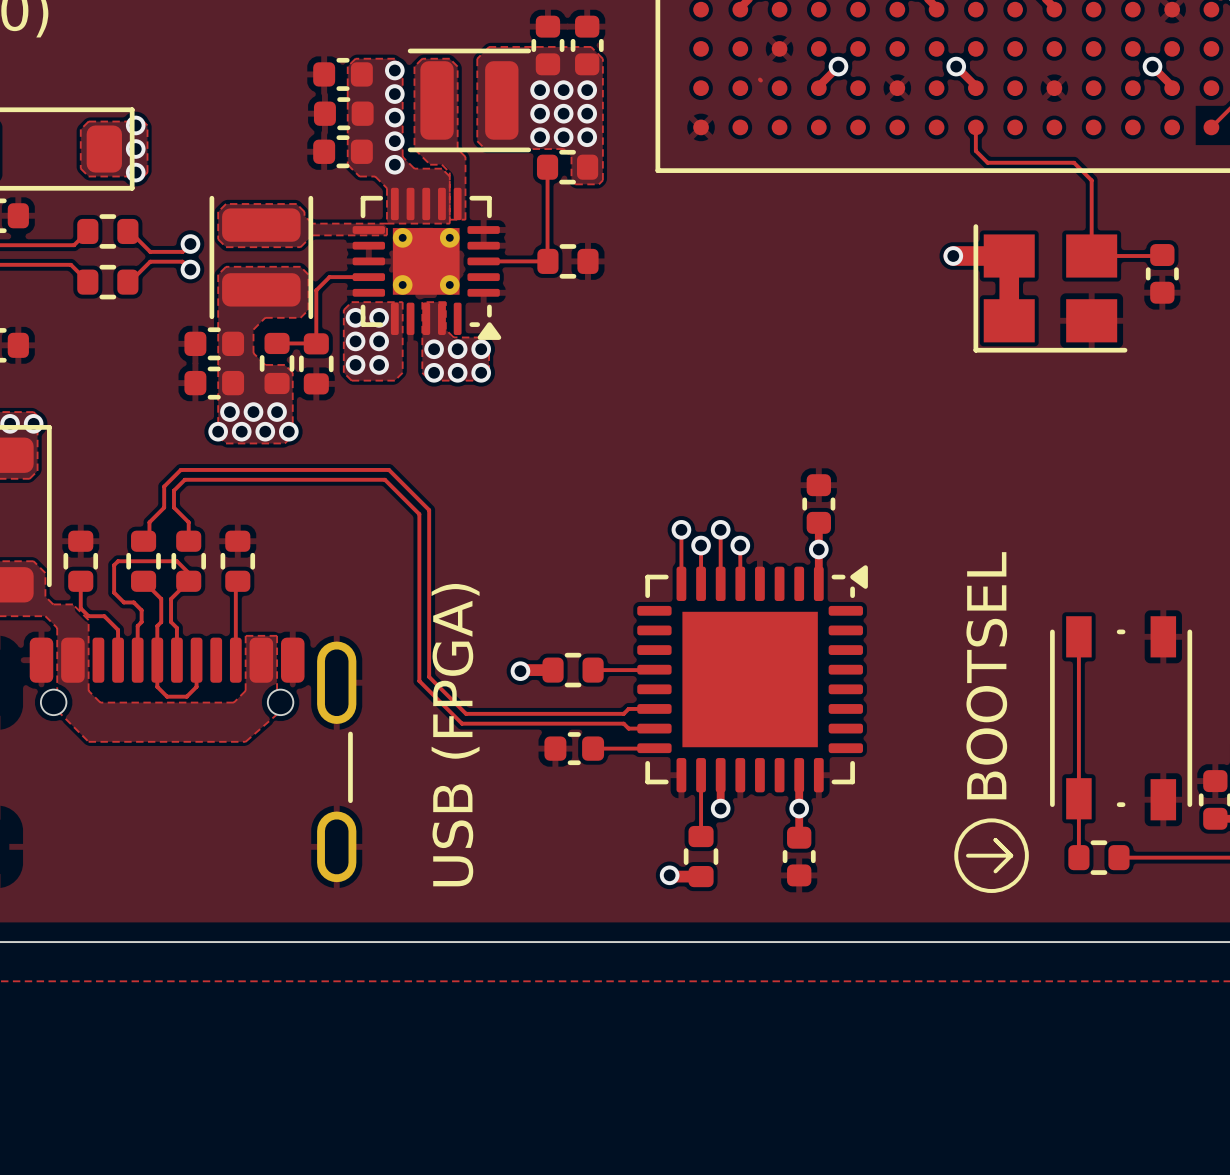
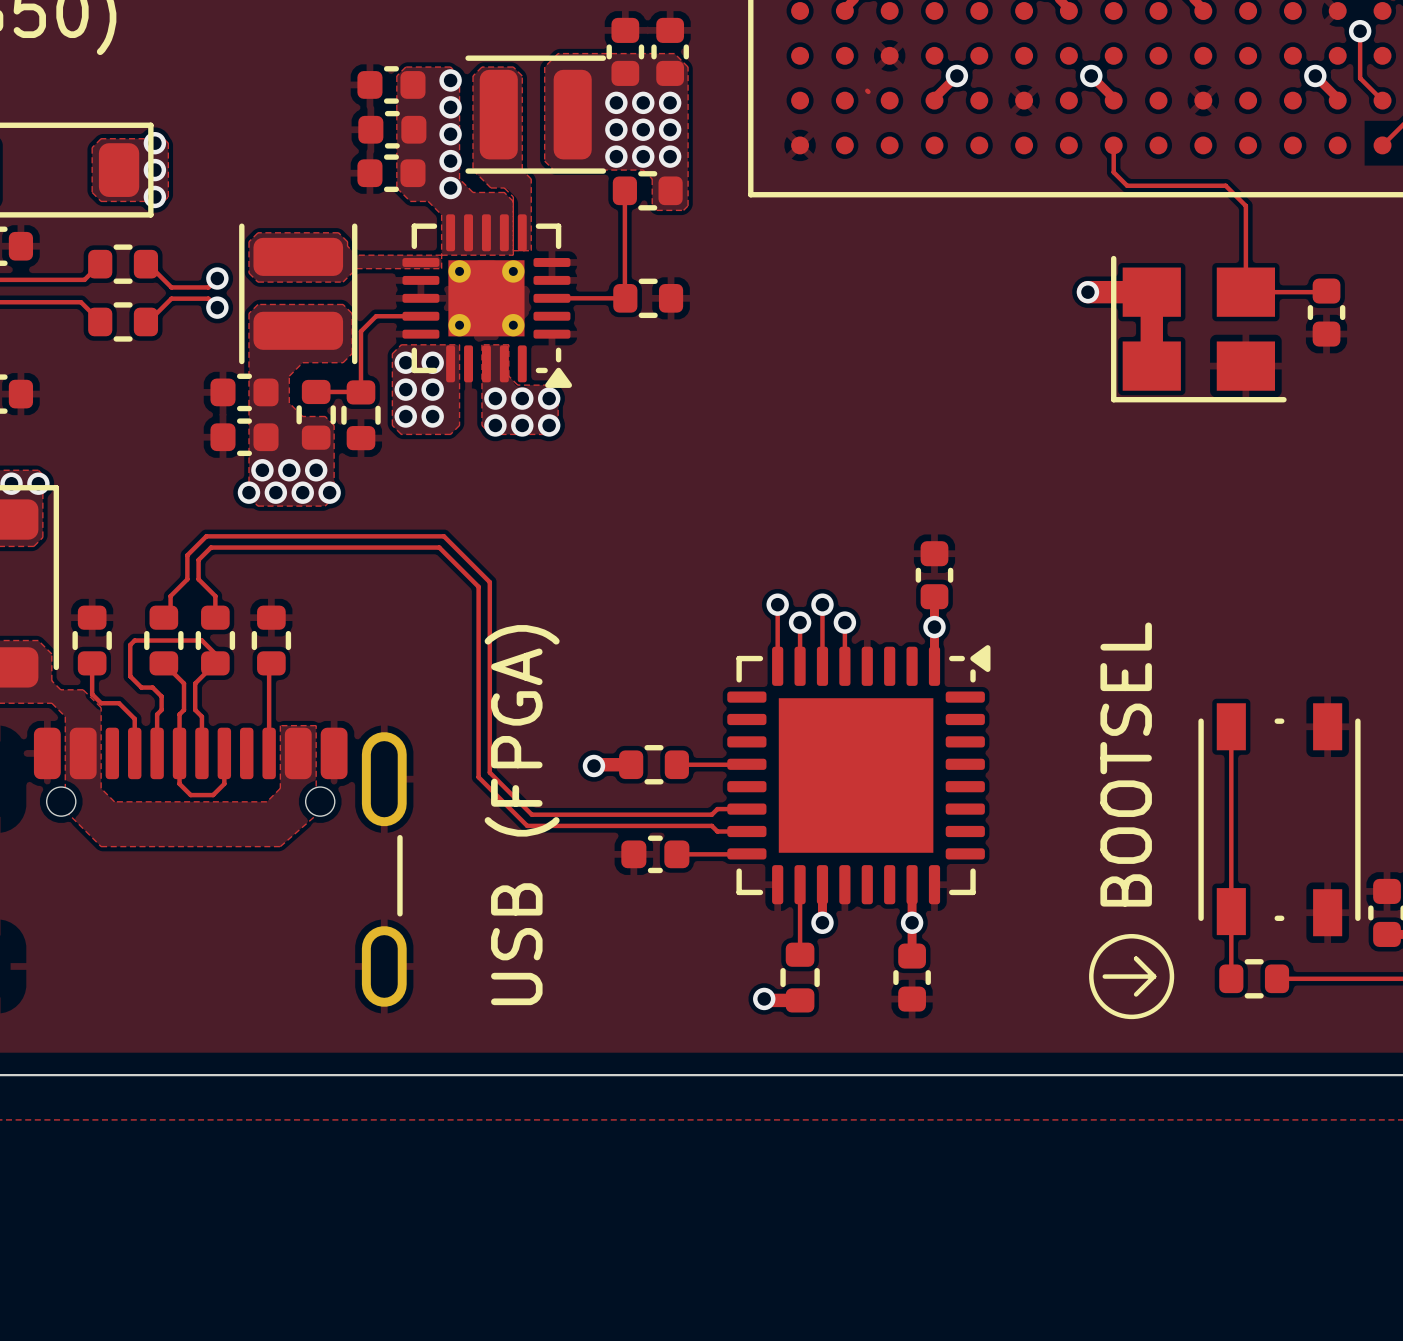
track: none -> (1360, 31) (1360, 78) (1382, 100)
via: none -> (1360, 31)

